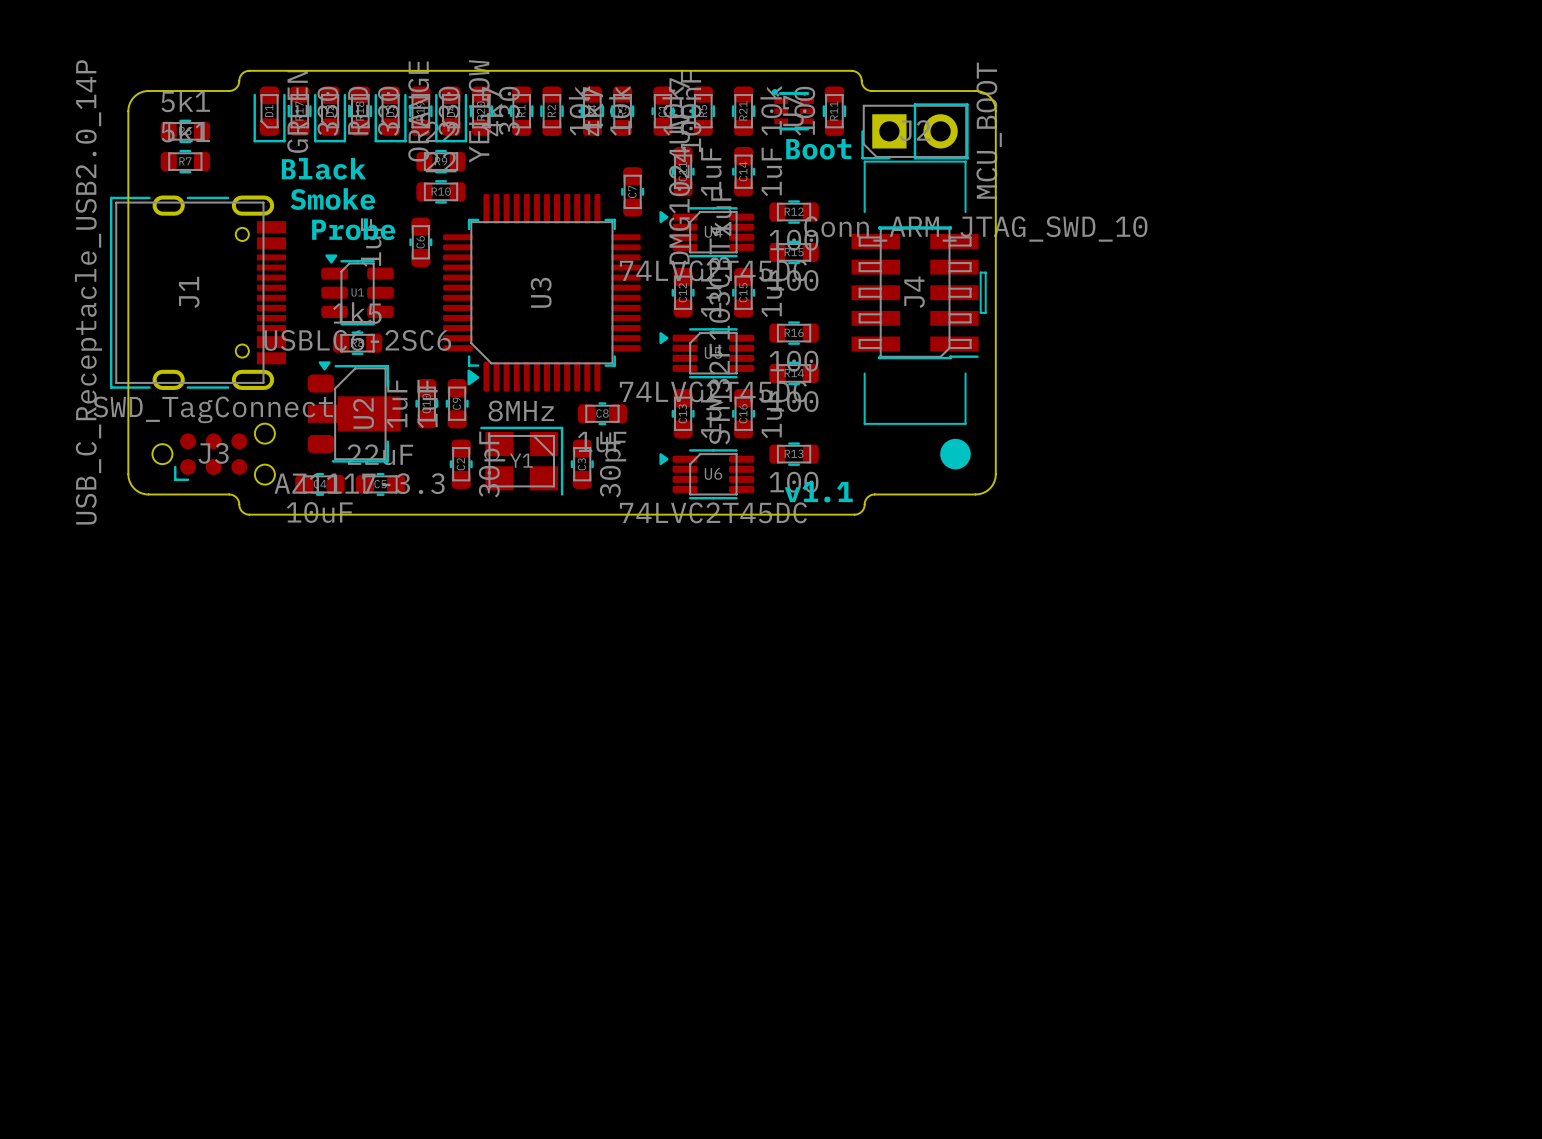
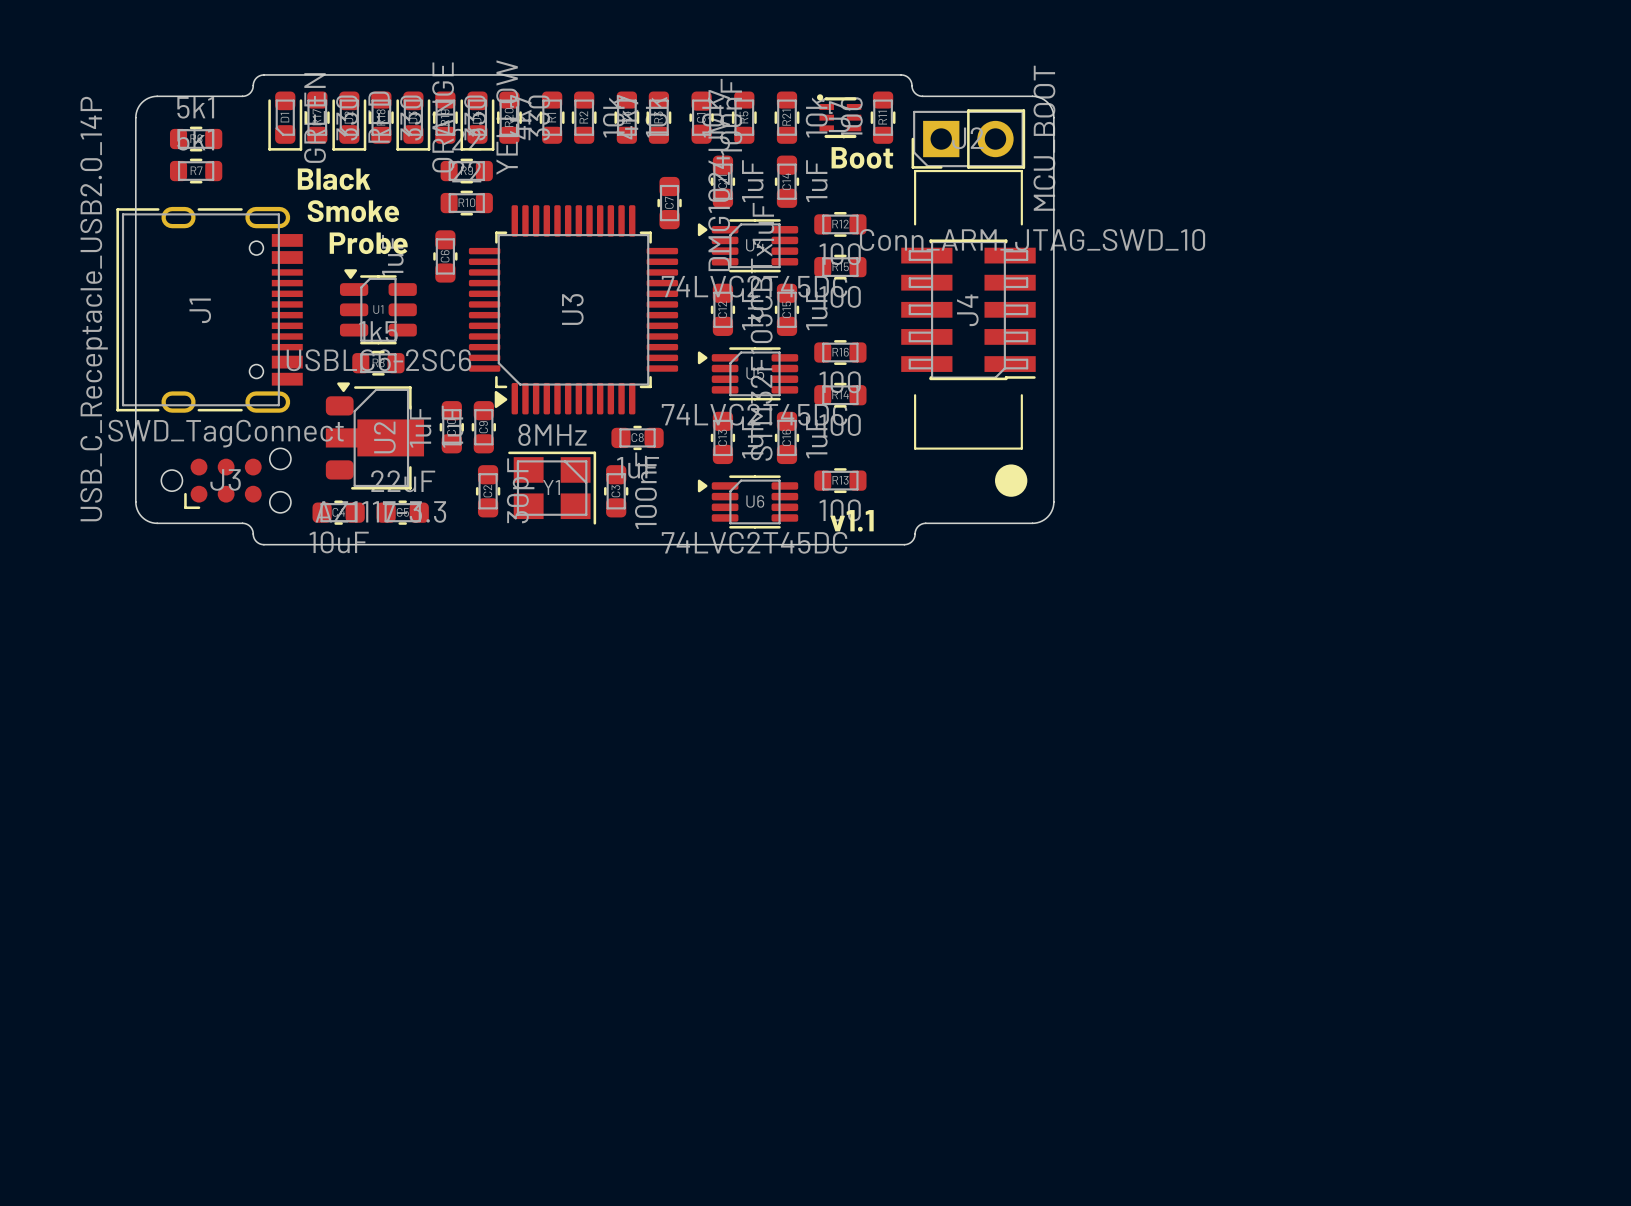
line: (980, 272) (980, 312) (985, 312) (985, 272) (980, 272) -> none
C3 value: 30pF (613, 464) -> 100nF (645, 490)

